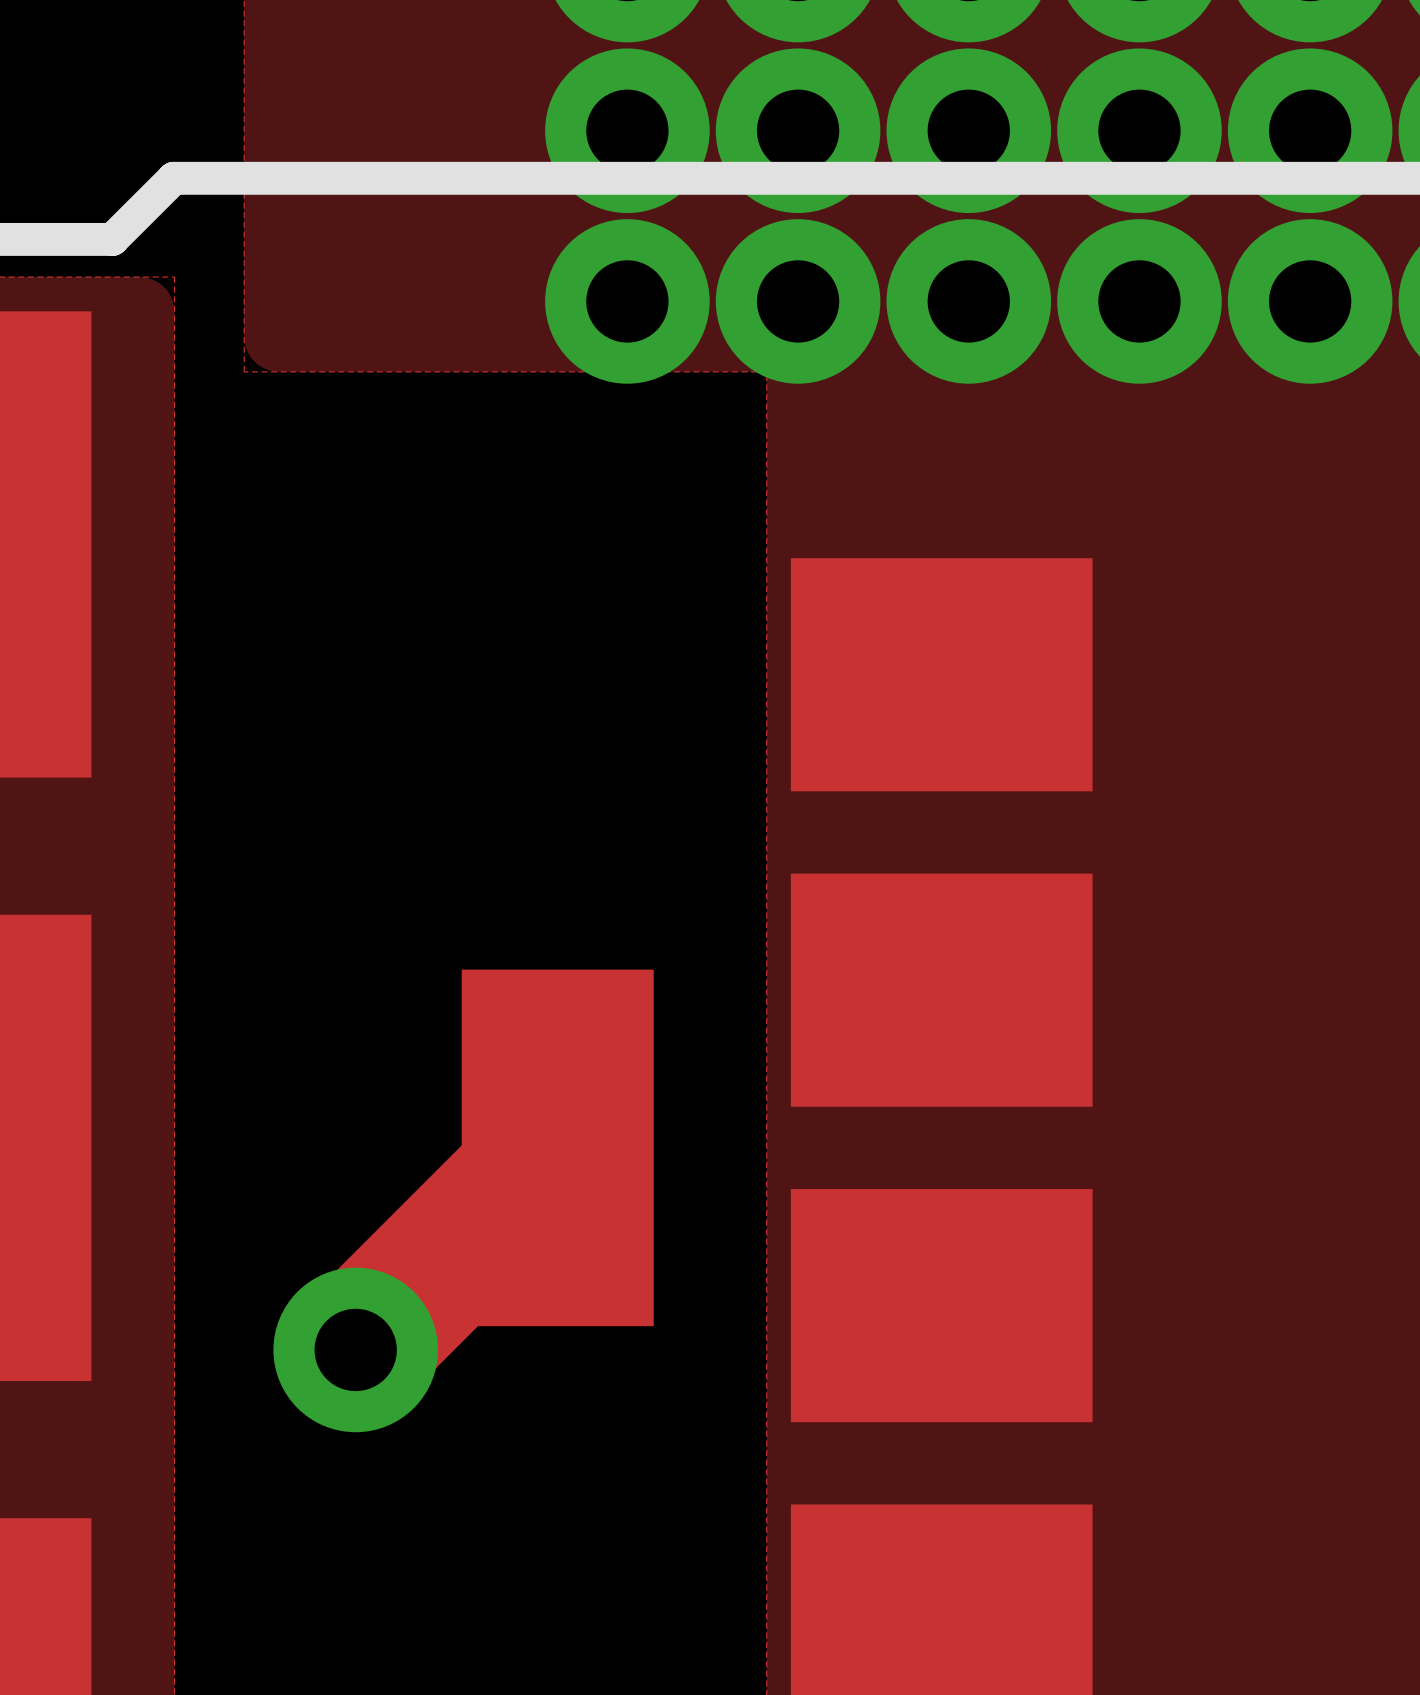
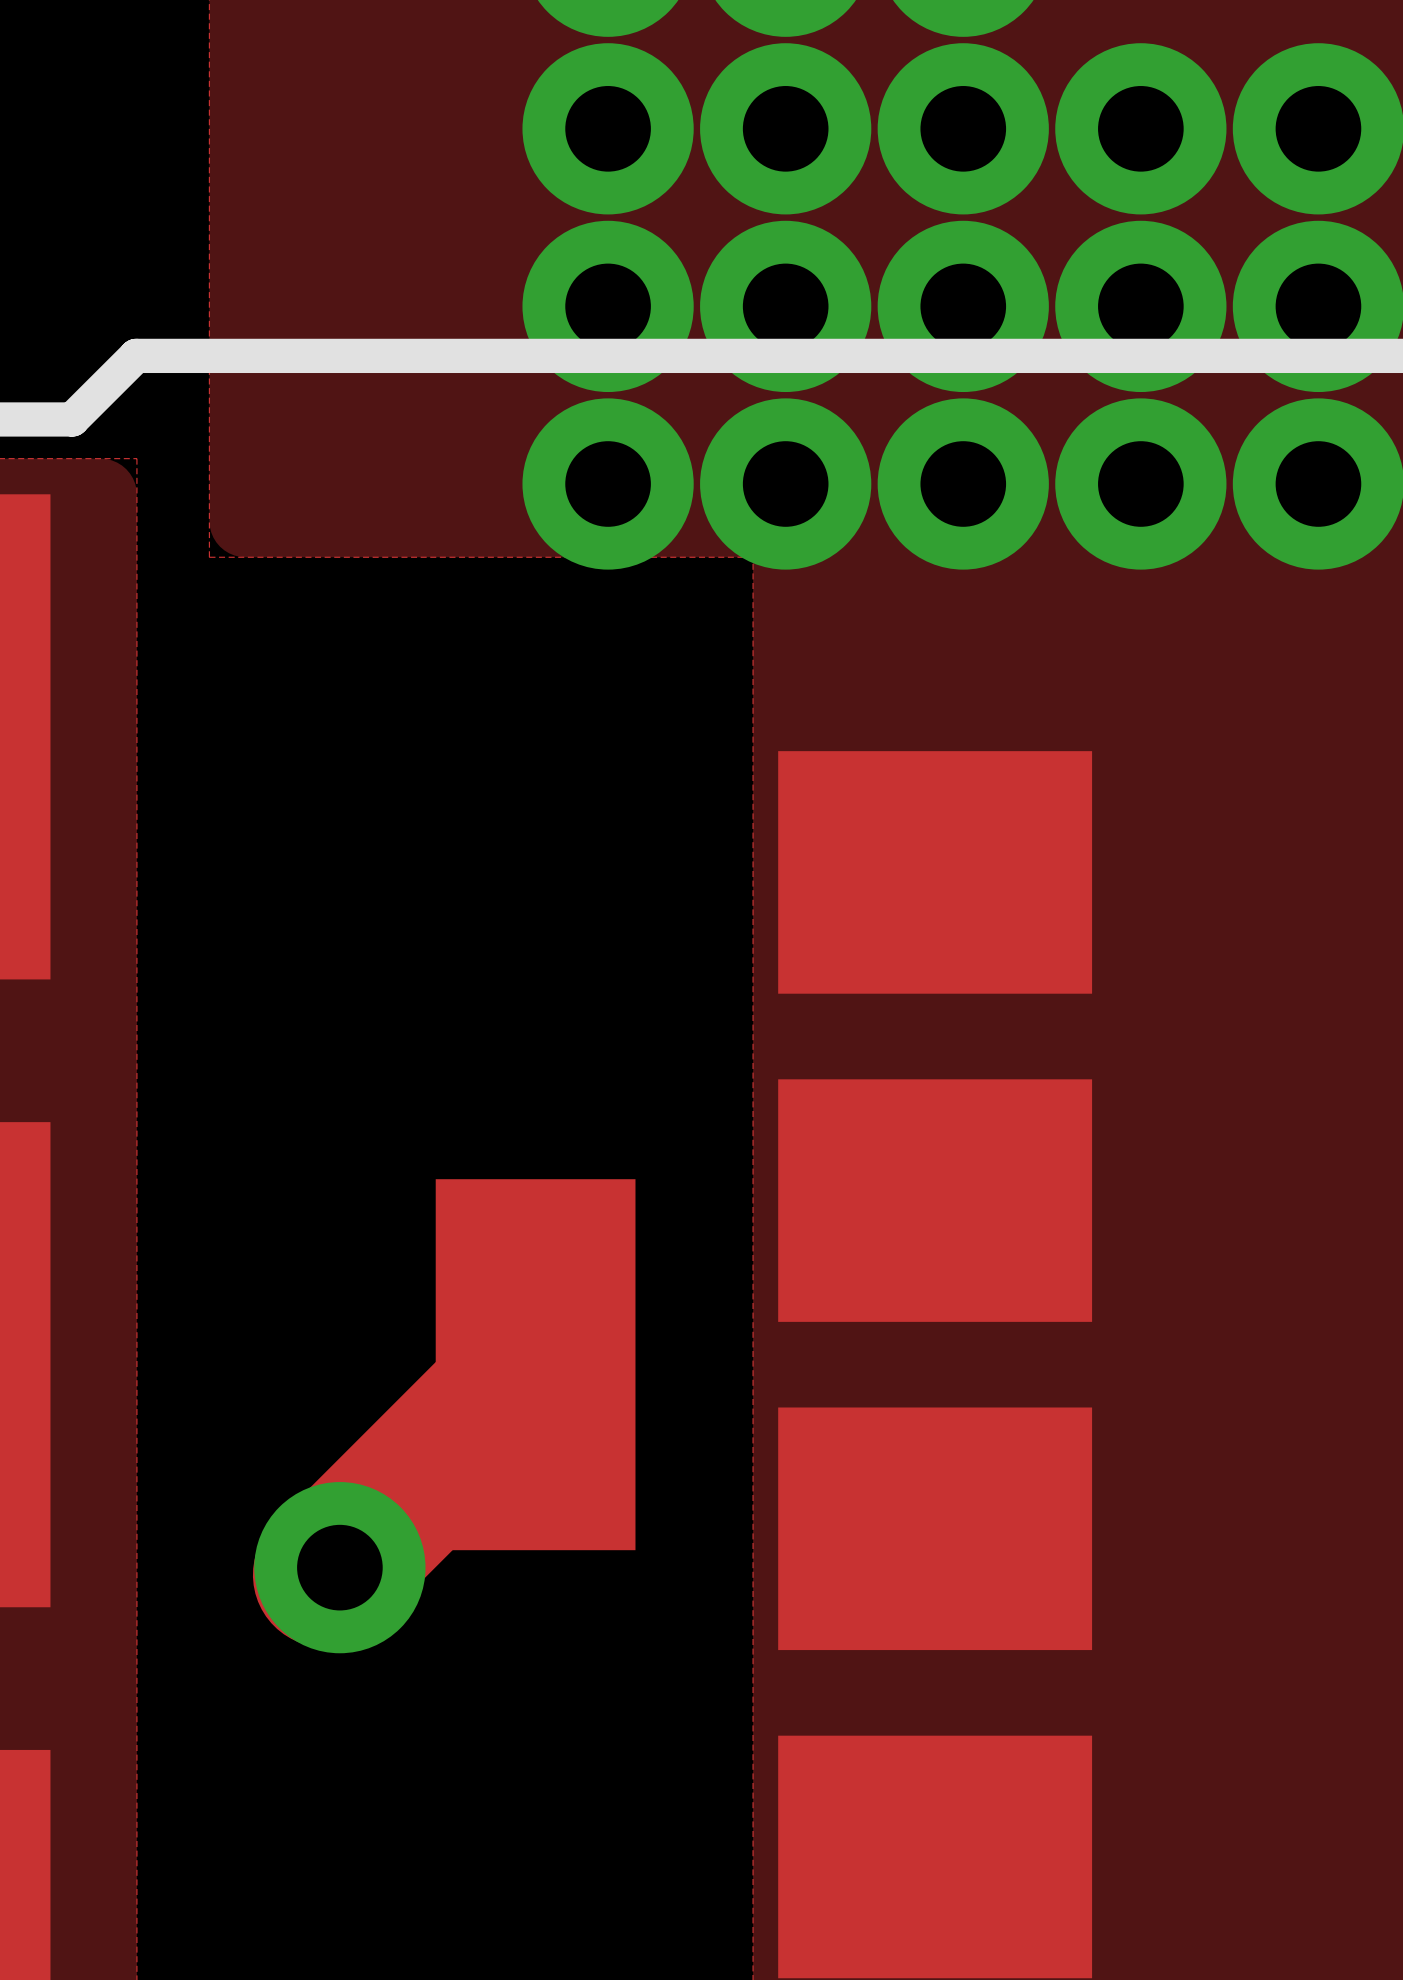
via position: (355, 1349) -> (339, 1567)

